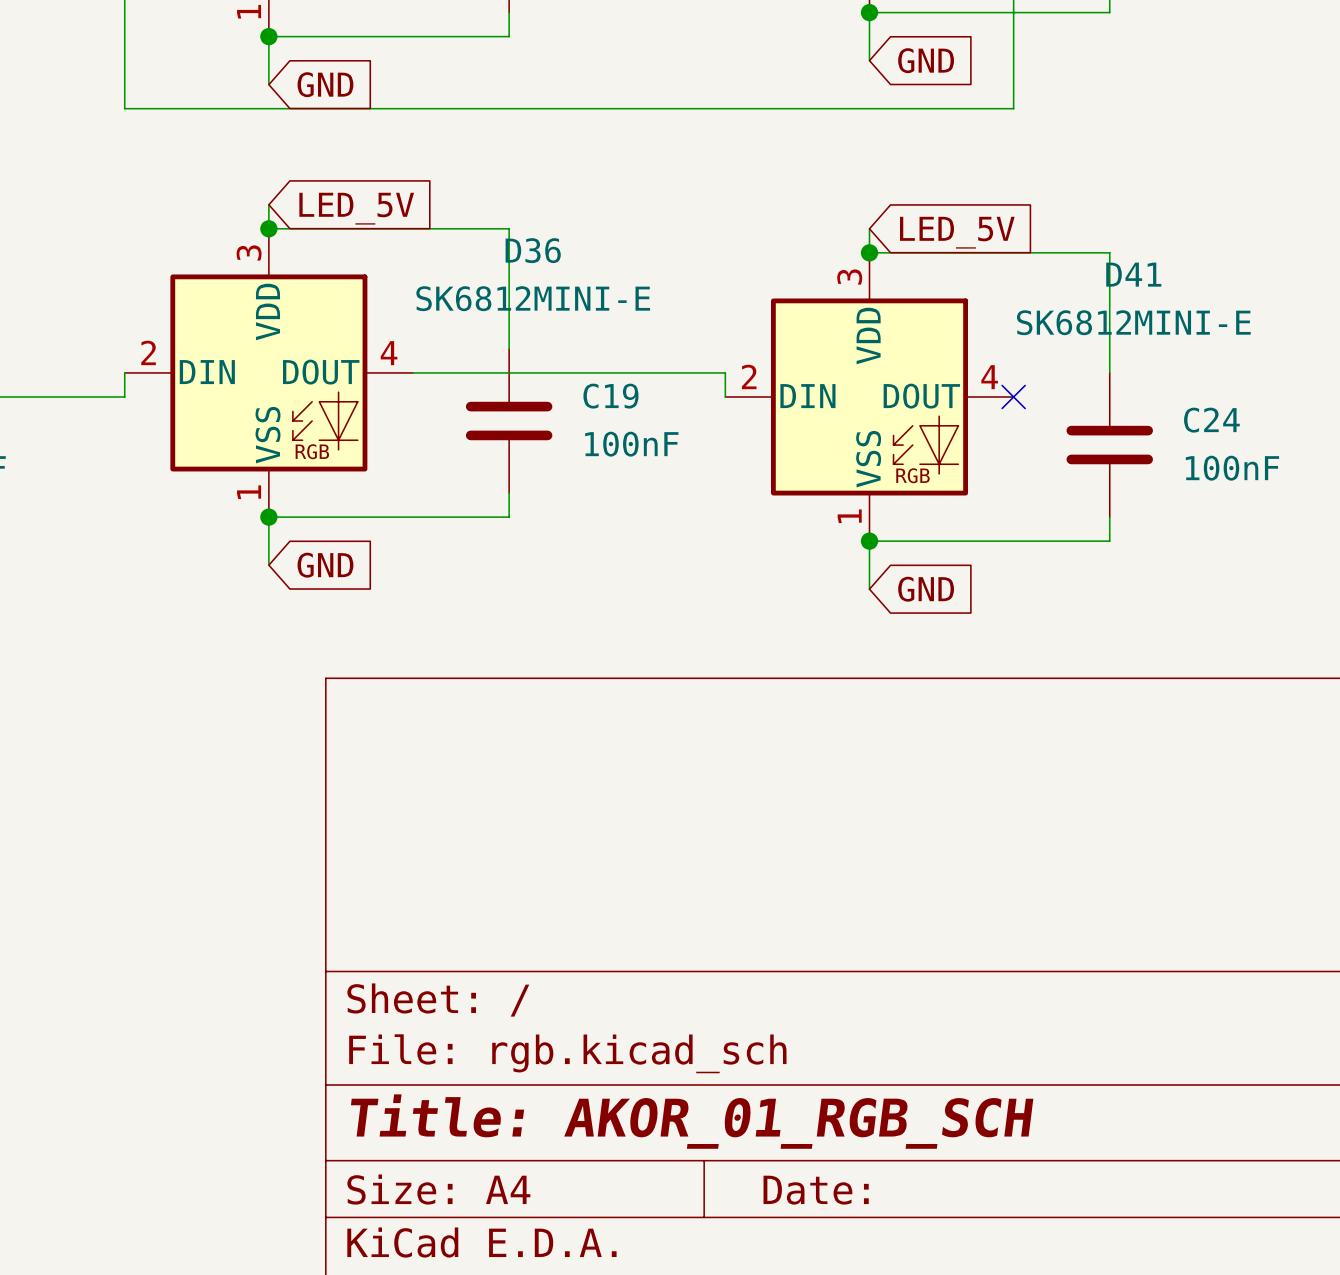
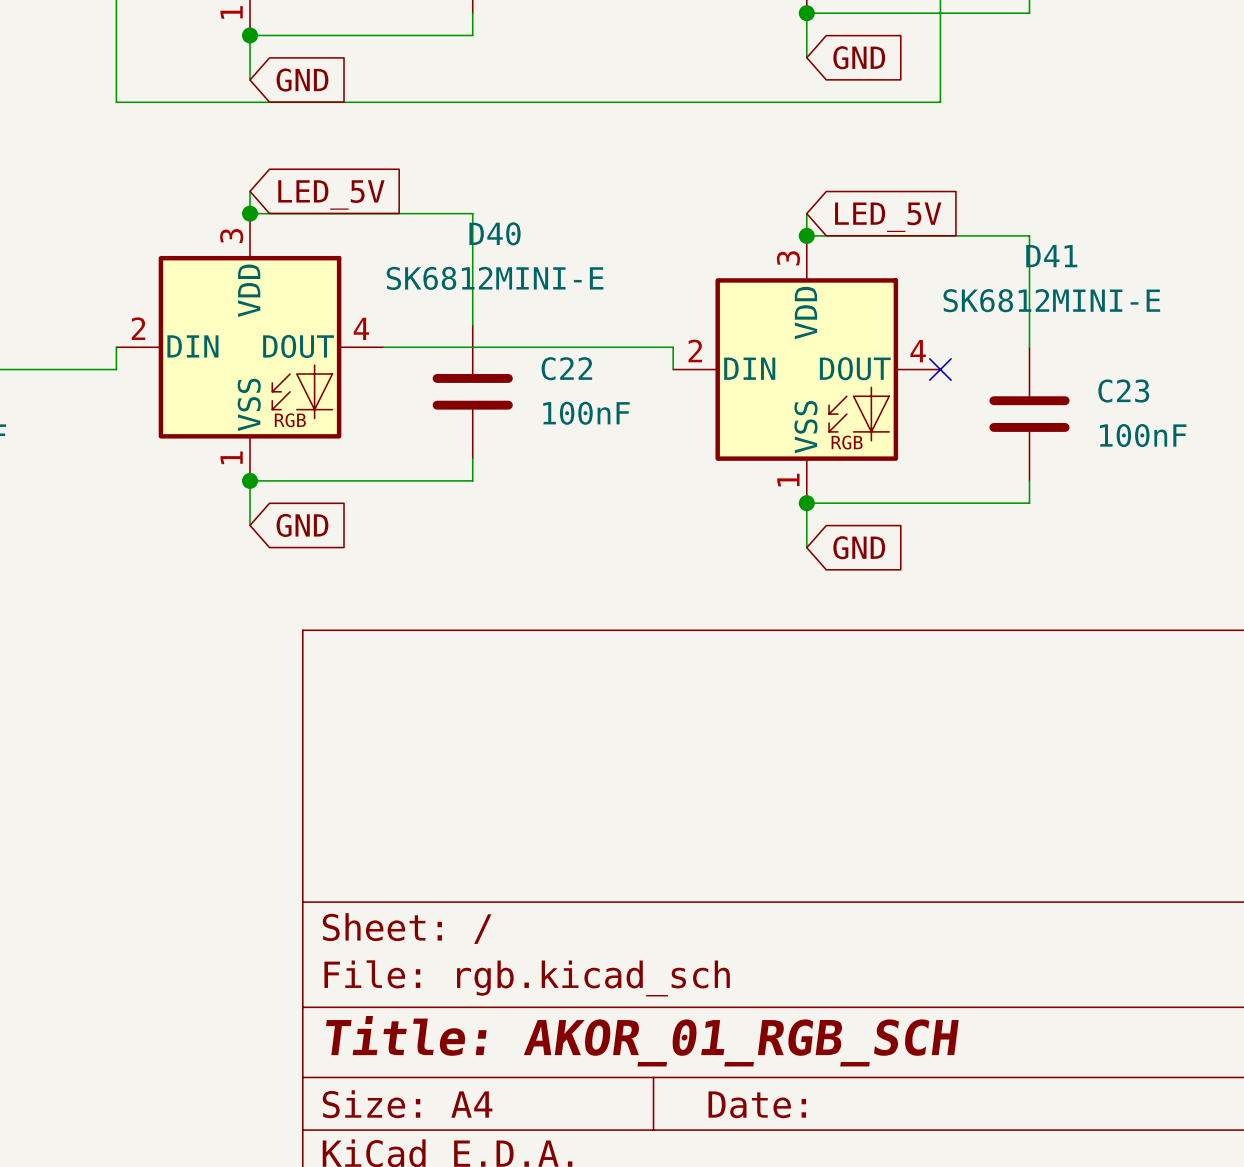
D36 name: D36 (533, 250) -> D40 (495, 233)
C19 name: C19 (610, 396) -> C22 (566, 368)
C24 name: C24 (1211, 420) -> C23 (1123, 390)

